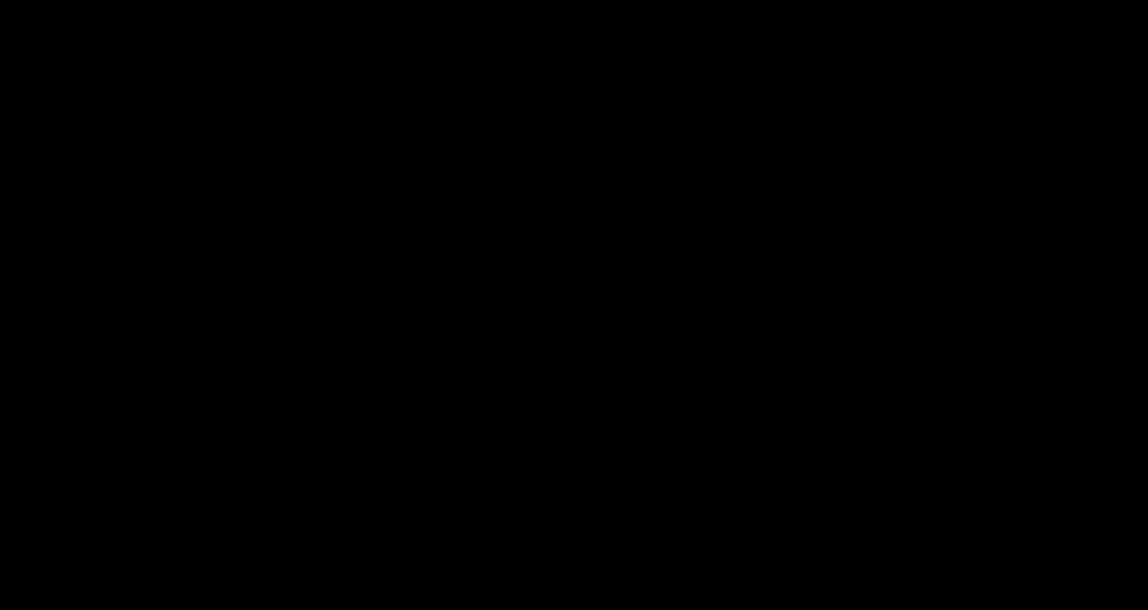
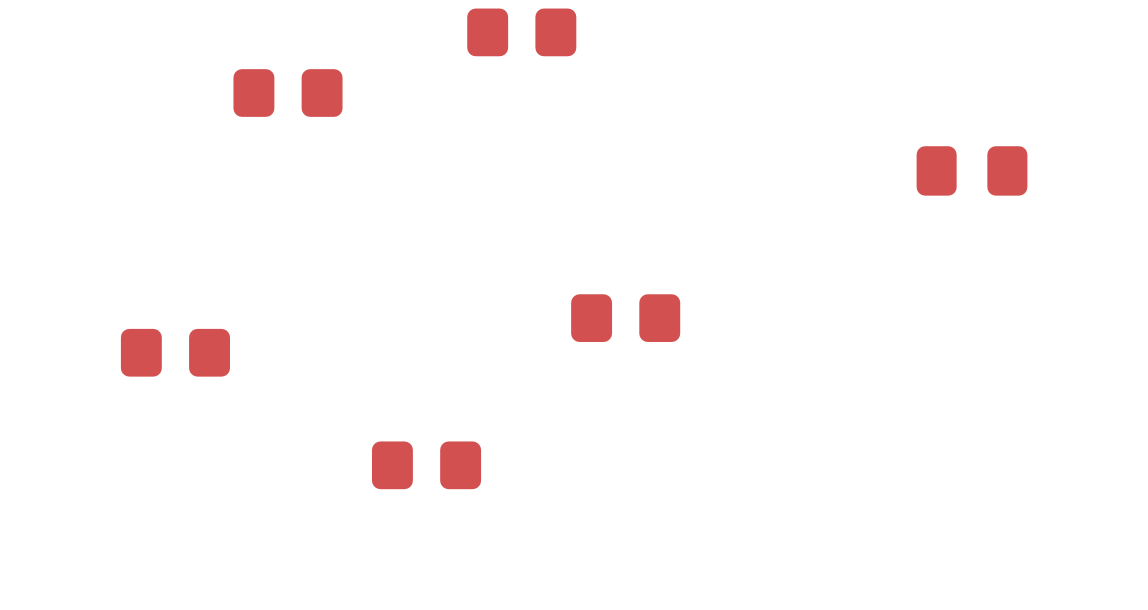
part: none -> (521, 32)
part: none -> (288, 93)
part: none -> (971, 170)
part: none -> (625, 318)
part: none -> (175, 352)
part: none -> (426, 465)

